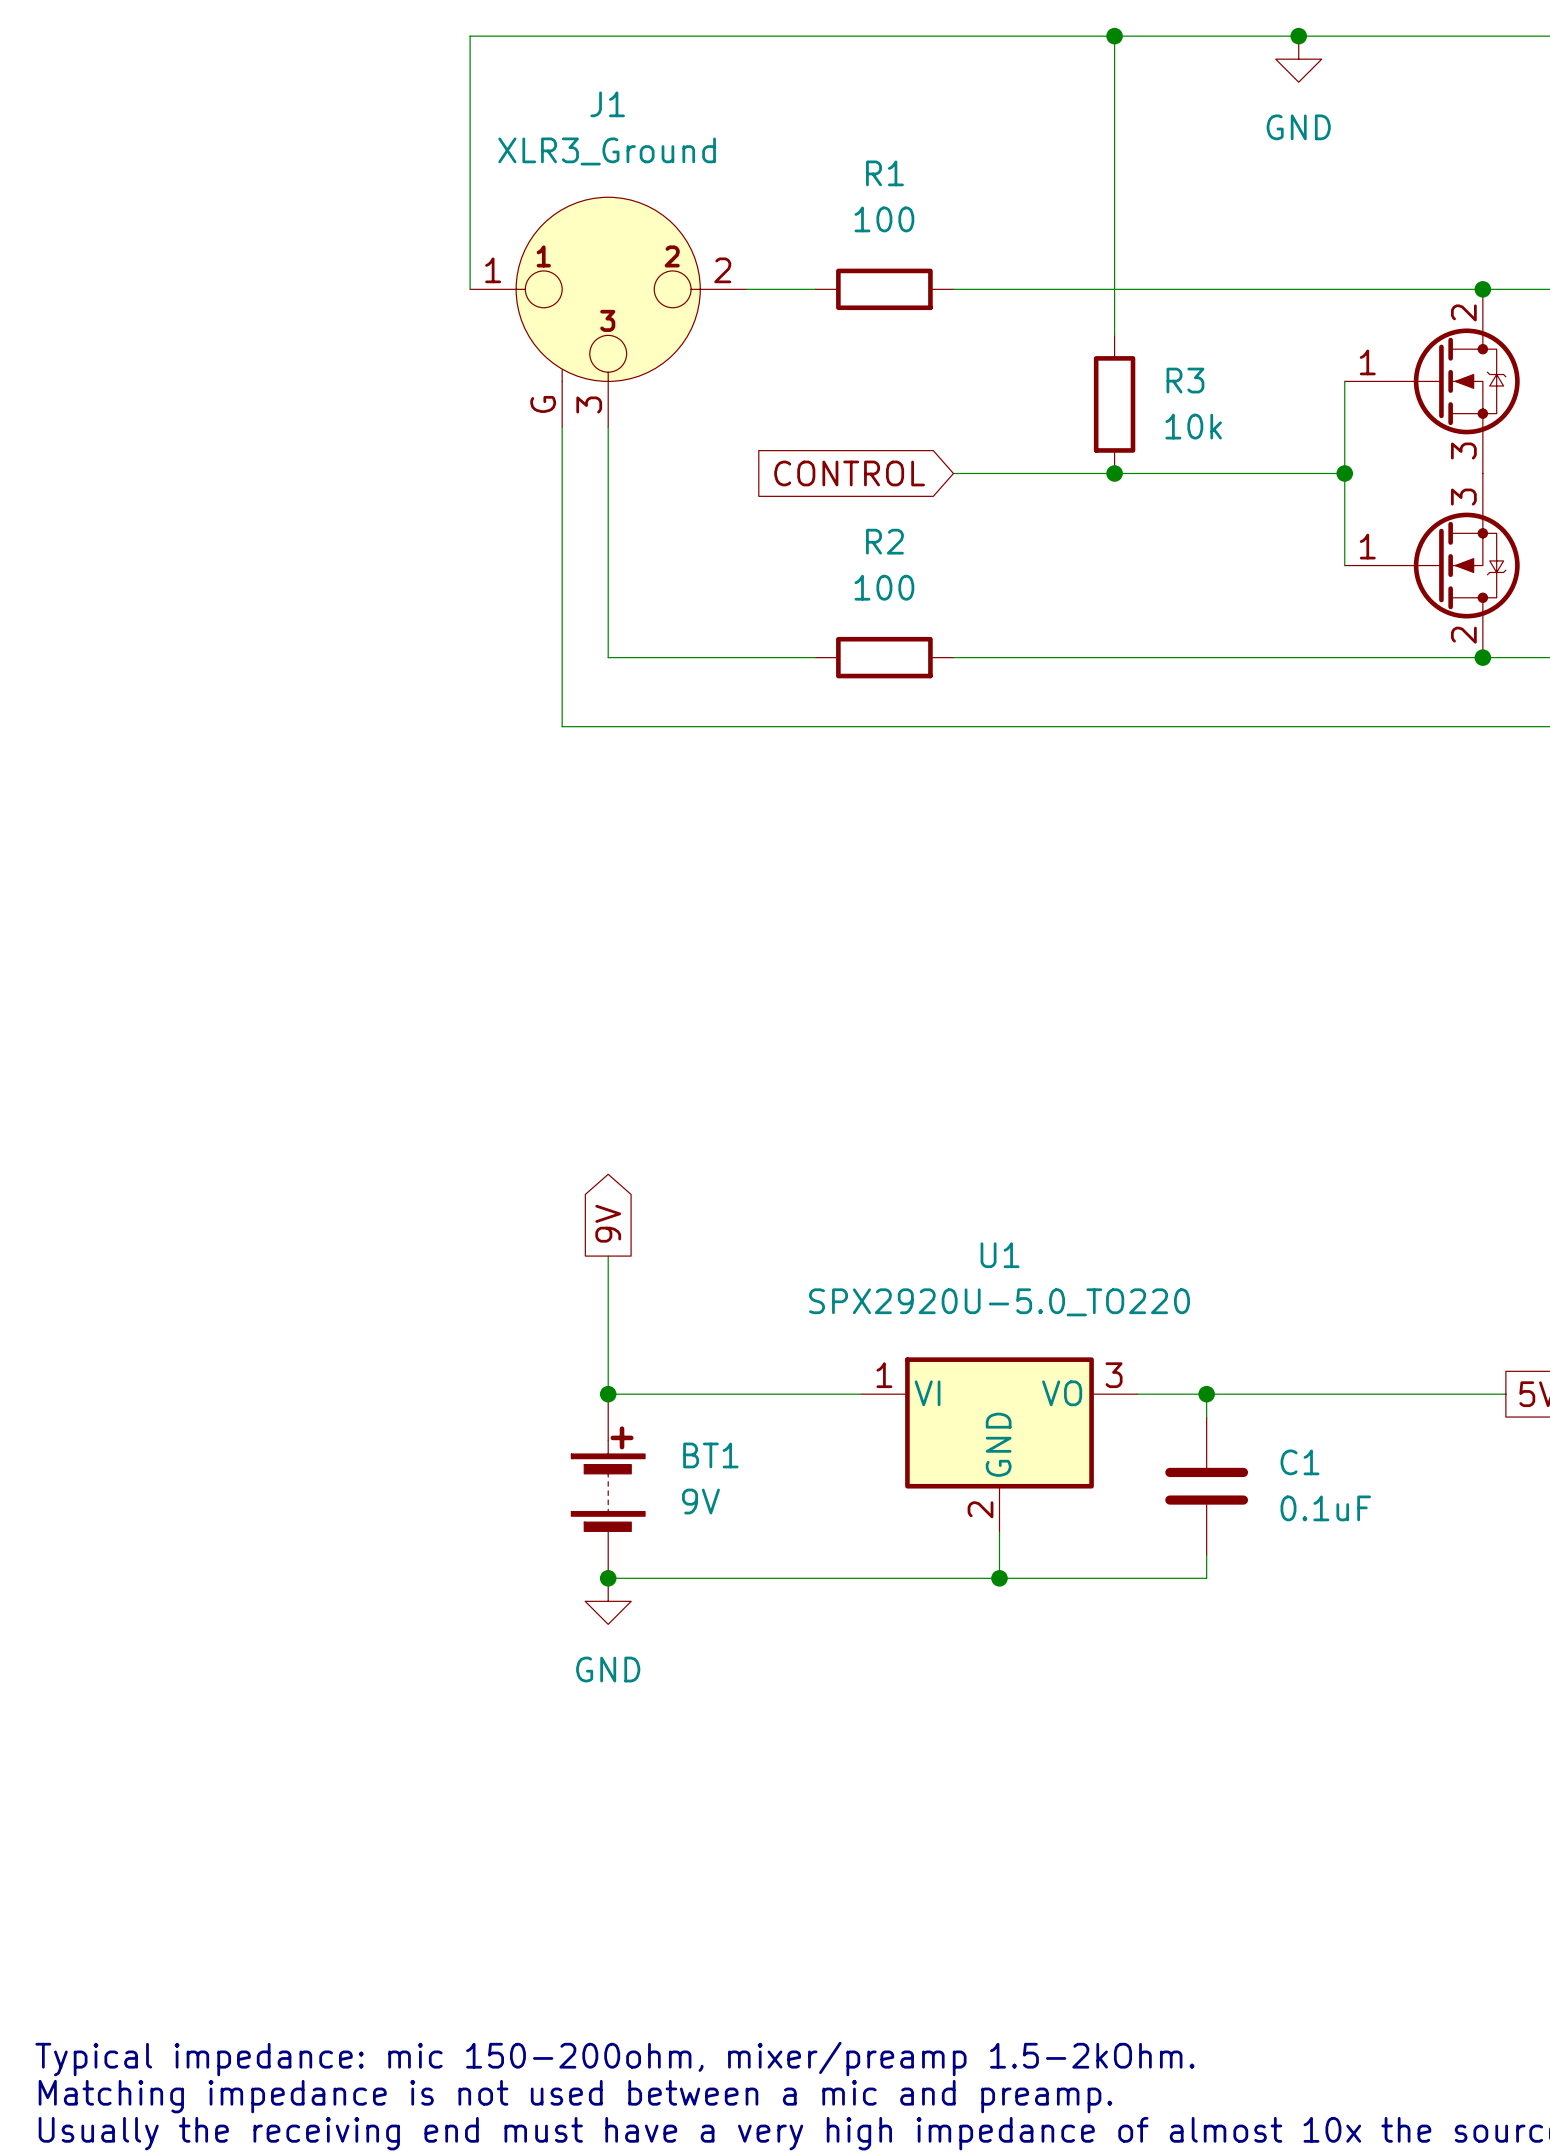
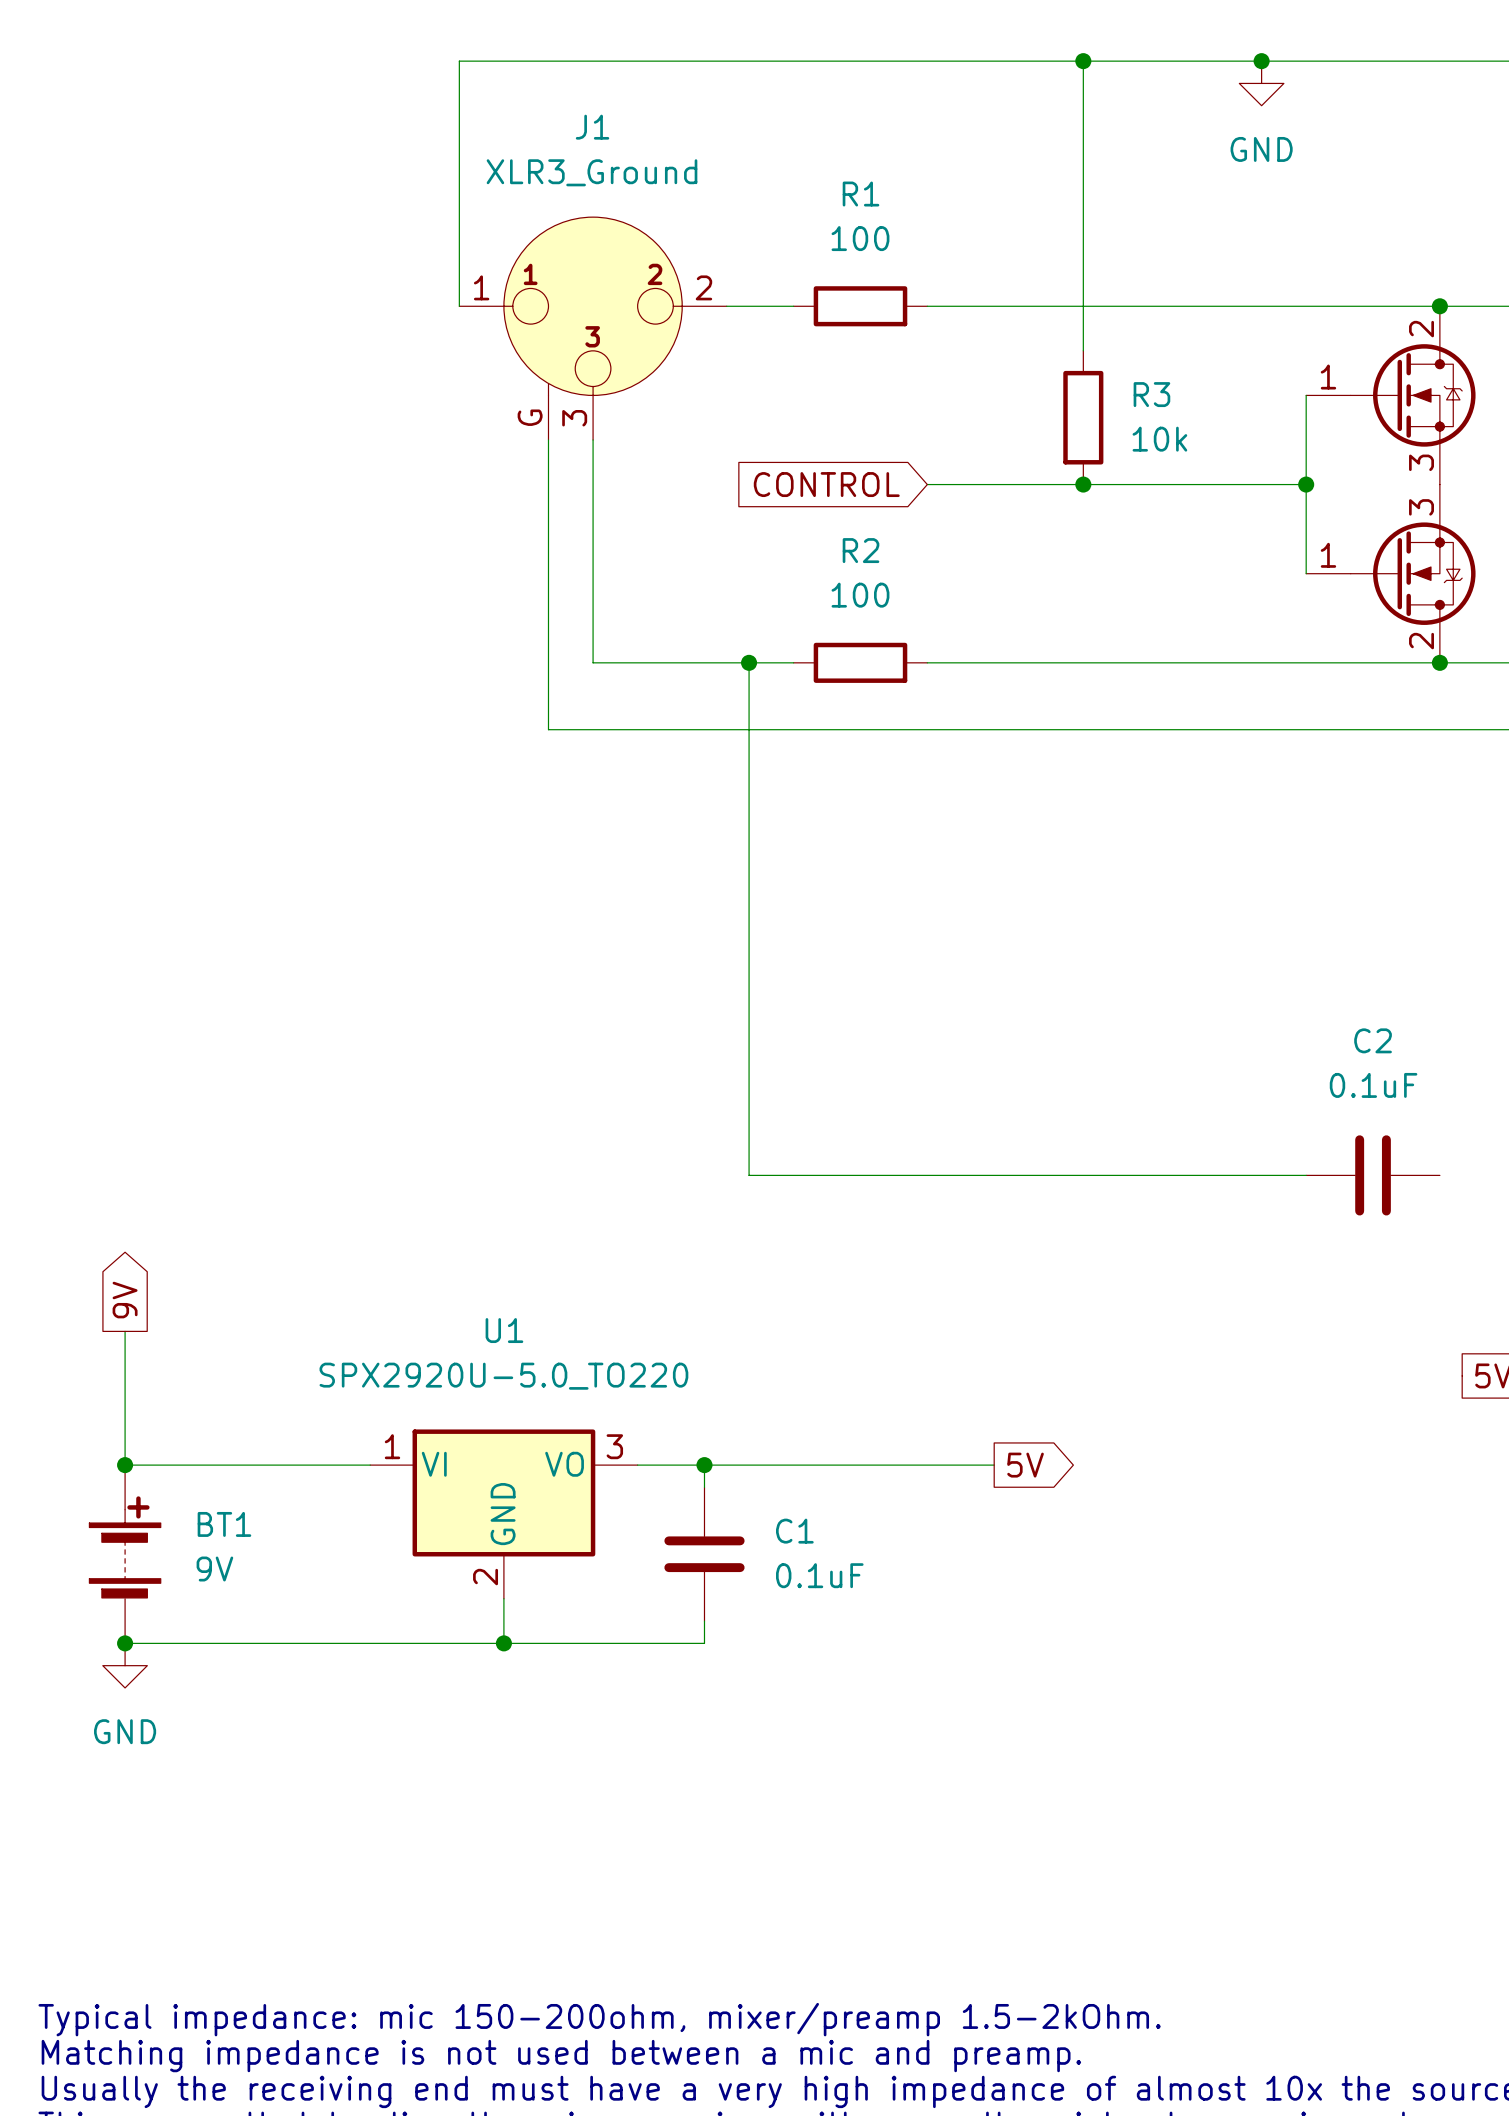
wire: none -> (749, 662) (749, 1175) (1306, 1175)
junction: none -> (749, 662)
C2: none -> 0.1uF (1373, 1175)
global label: 9V (608, 1223) -> none
wire: (608, 1256) (608, 1394) (861, 1394) -> none
global label: none -> 9V (125, 1300)
wire: none -> (125, 1331) (125, 1465) (370, 1465)
junction: (608, 1394) -> none
wire: (1137, 1394) (1505, 1394) -> none
wire: (1206, 1394) (1206, 1417) -> none
junction: (1206, 1394) -> none
U1 position: (999, 1444) -> (503, 1514)
junction: none -> (125, 1465)
BT1 position: (608, 1486) -> (125, 1554)
wire: none -> (637, 1465) (994, 1465)
wire: none -> (704, 1465) (704, 1487)
junction: none -> (704, 1465)
global label: none -> 5V (1025, 1465)
C1 position: (1206, 1486) -> (704, 1554)
wire: (999, 1532) (999, 1578) -> none
wire: (1206, 1555) (1206, 1578) (608, 1578) -> none
junction: (608, 1578) -> none
junction: (999, 1578) -> none
power symbol: GND (608, 1601) -> none
wire: none -> (503, 1598) (503, 1643)
wire: none -> (704, 1621) (704, 1643) (125, 1643)
junction: none -> (125, 1643)
junction: none -> (503, 1643)
power symbol: none -> GND (125, 1665)

